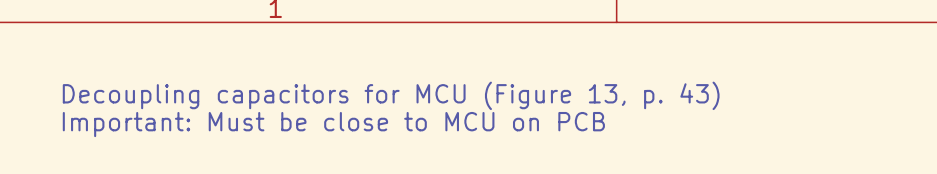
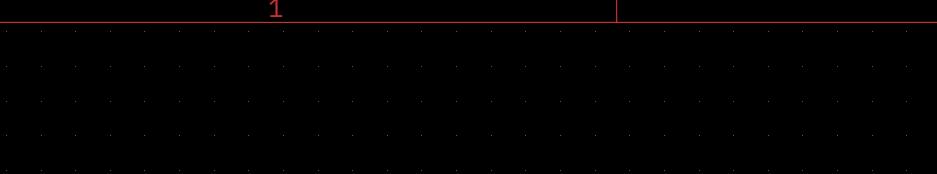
text: Decoupling capacitors for MCU (Figure 13, p. 43) (391, 95) -> none
text: Important: Must be close to MCU on PCB (333, 124) -> none

